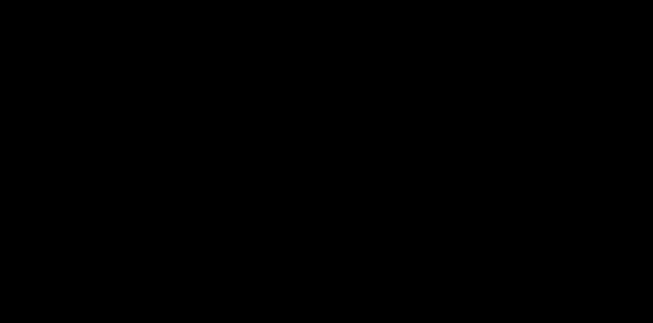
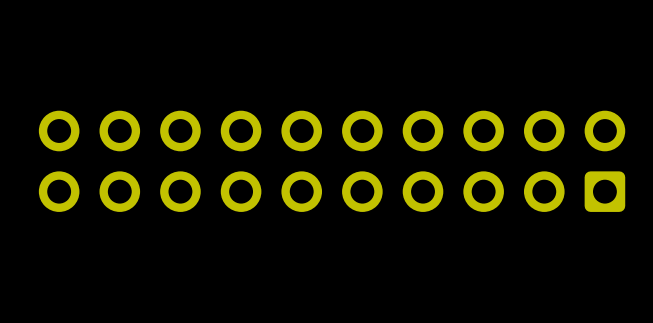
part: none -> (332, 161)

